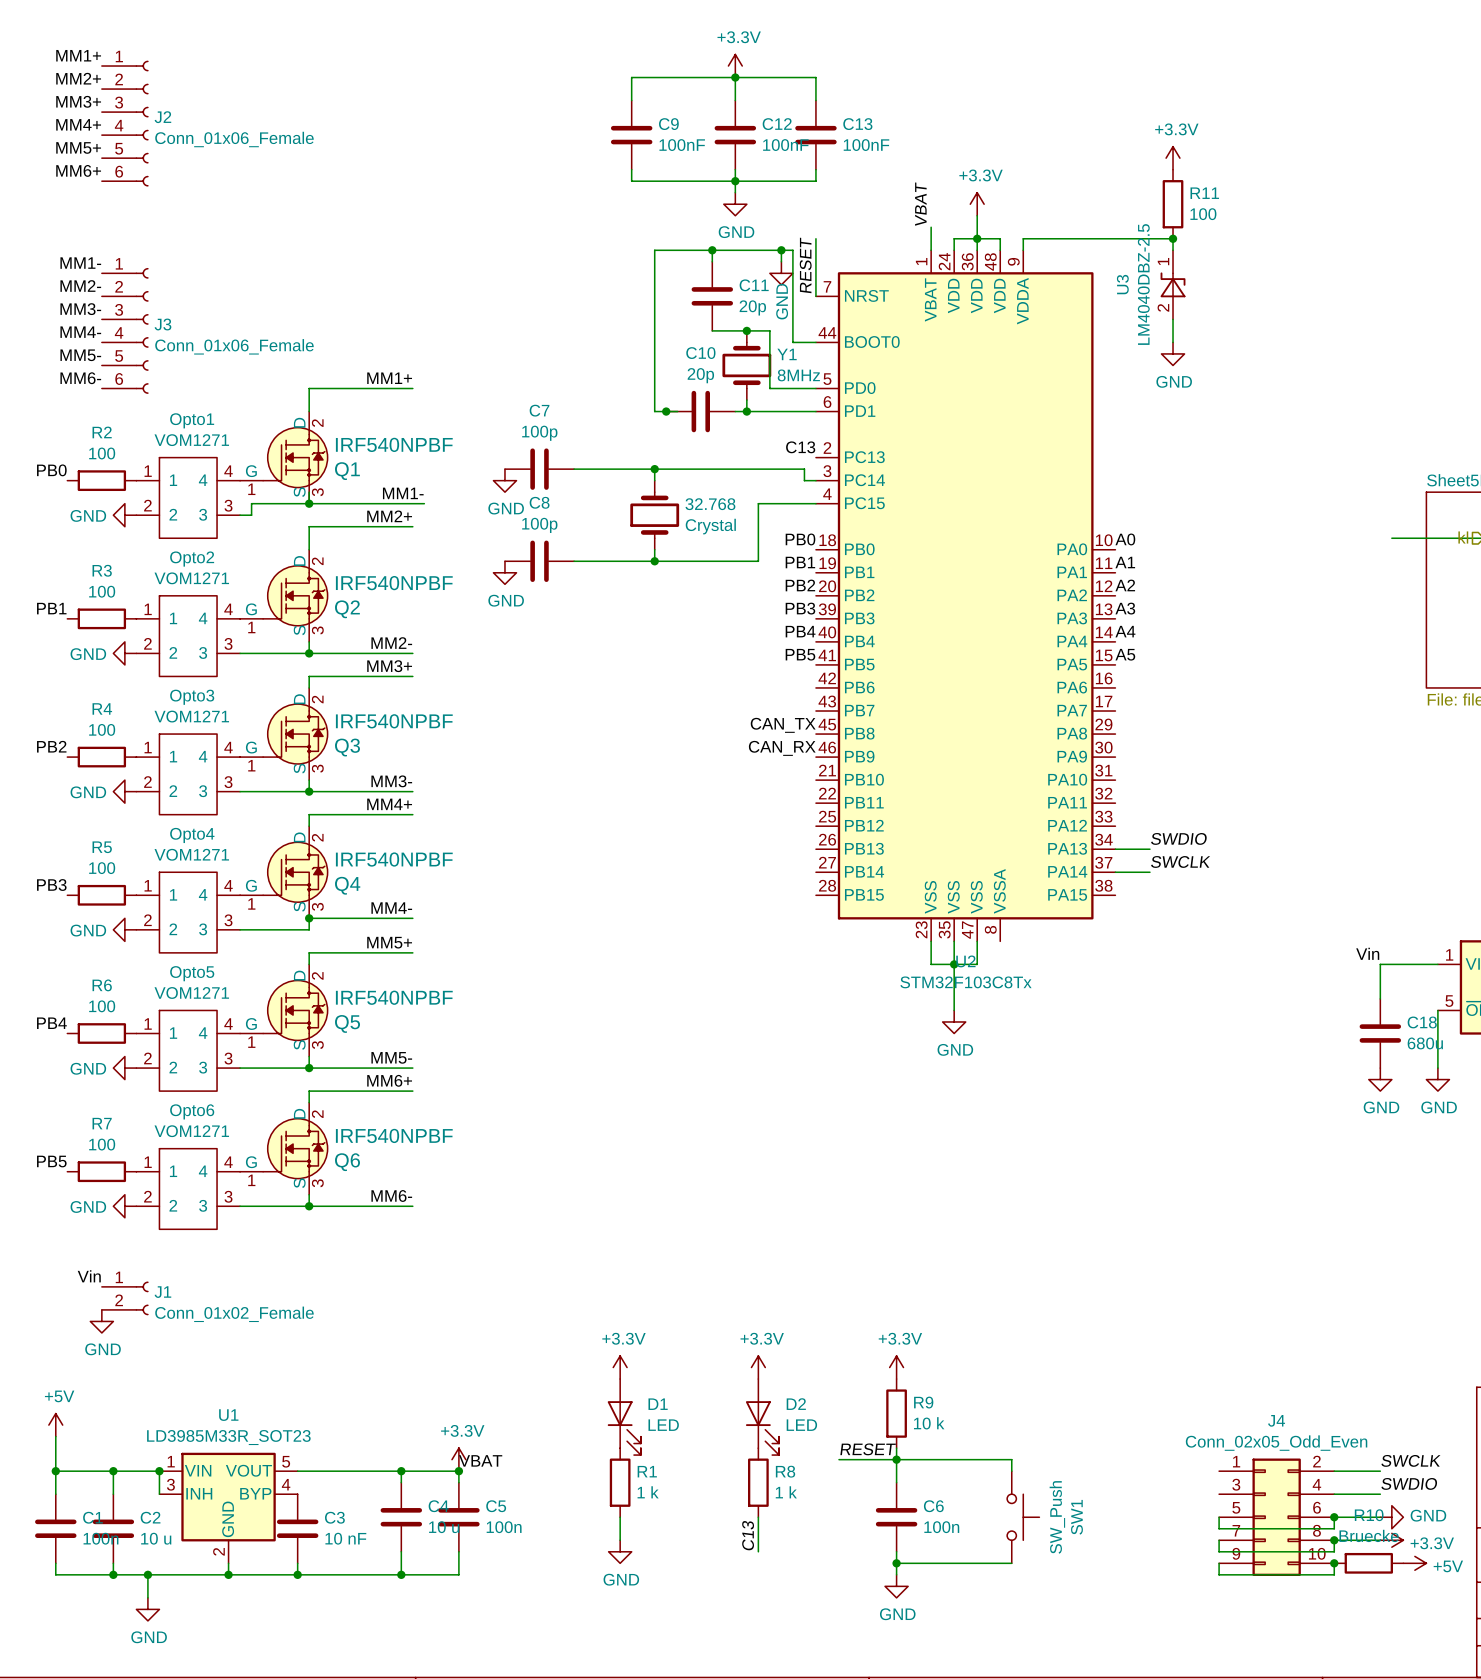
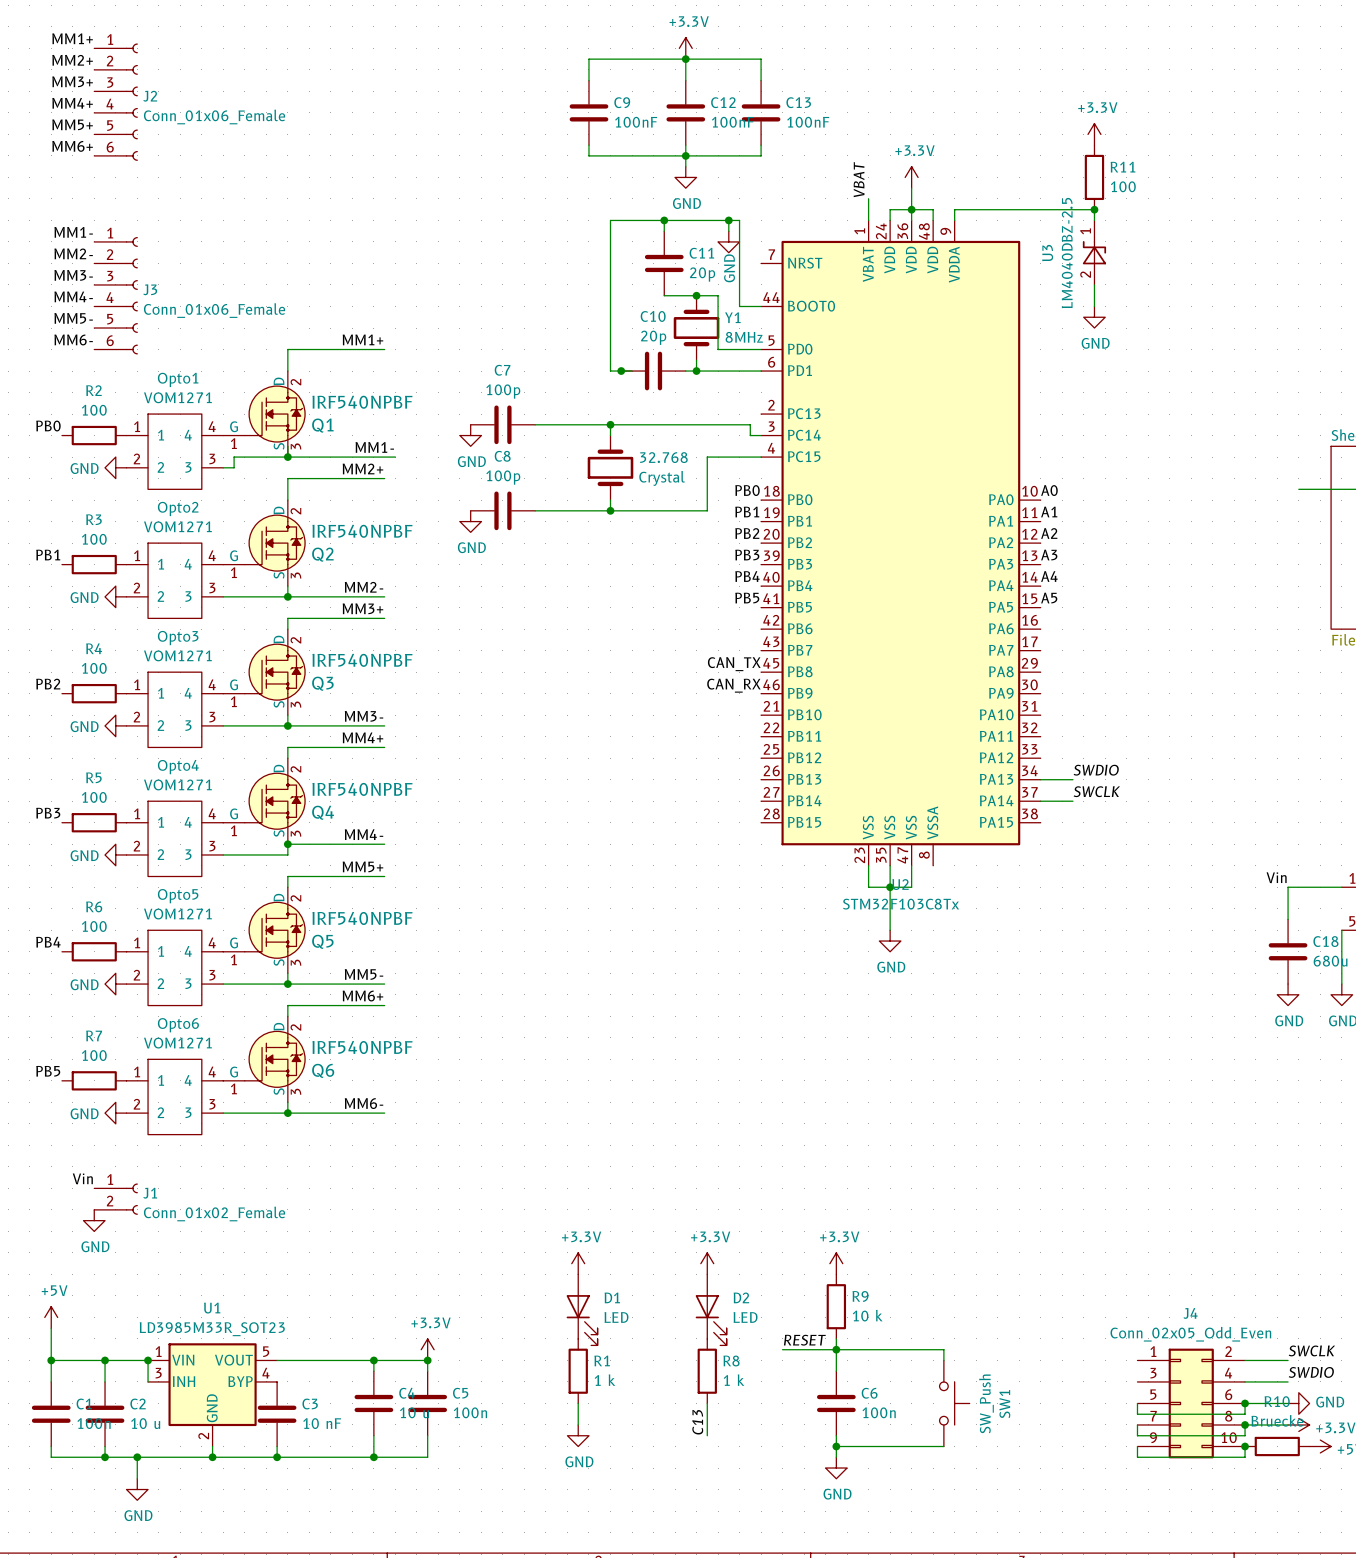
wire: (815, 238) (815, 296) -> none
label: RESET (805, 265) -> none
label: C13 (800, 447) -> none
label: VBAT (480, 1460) -> none

